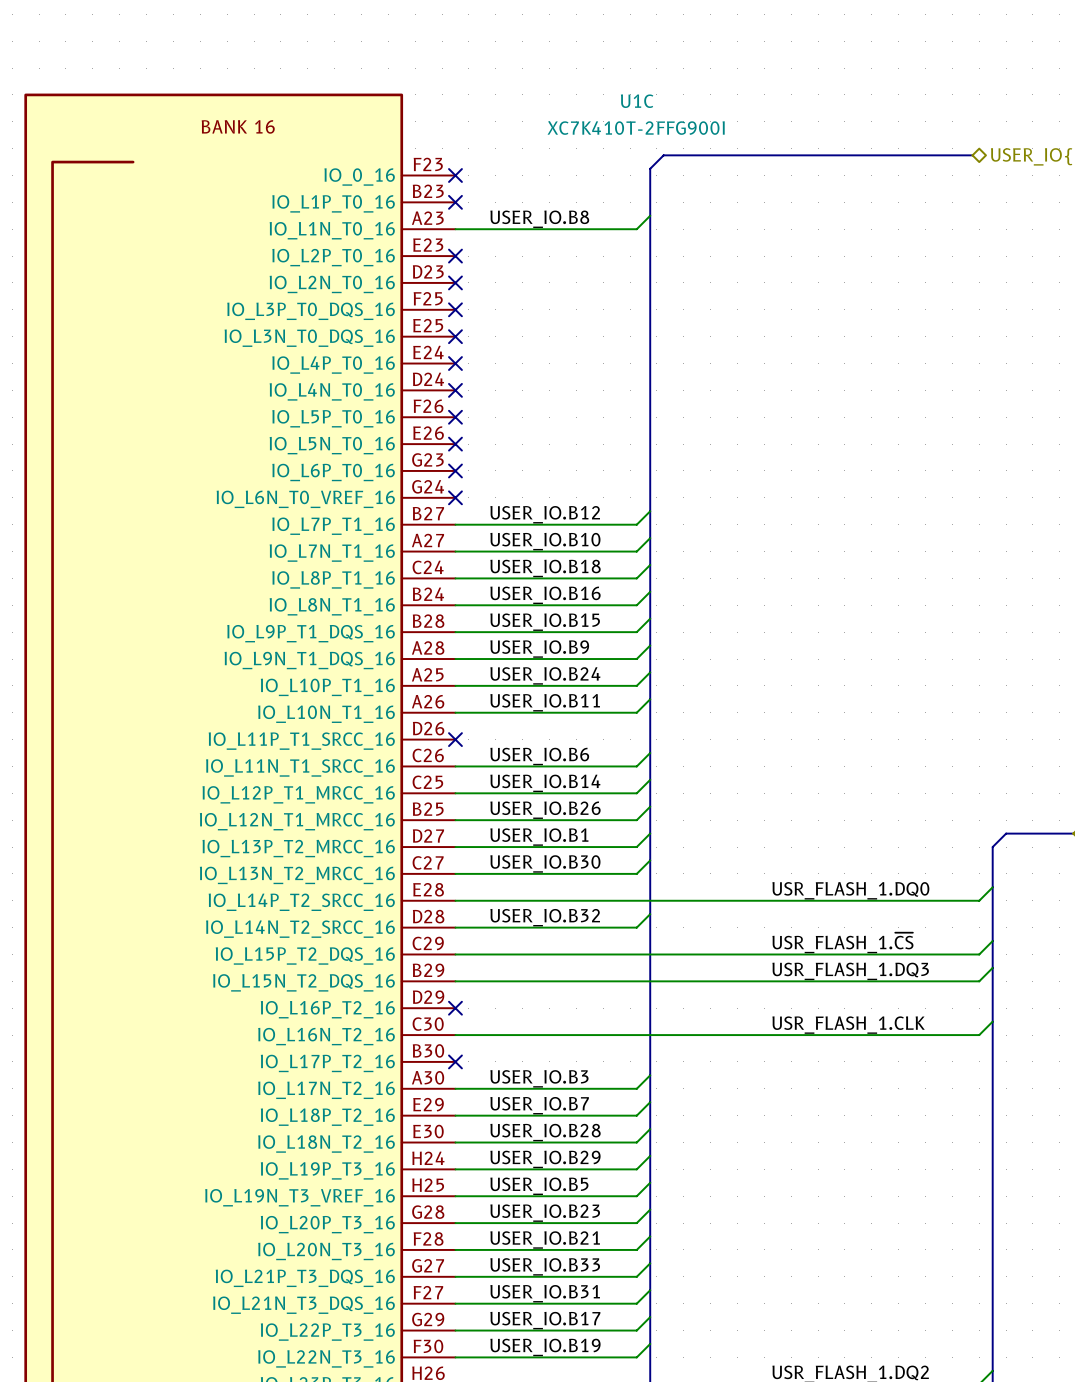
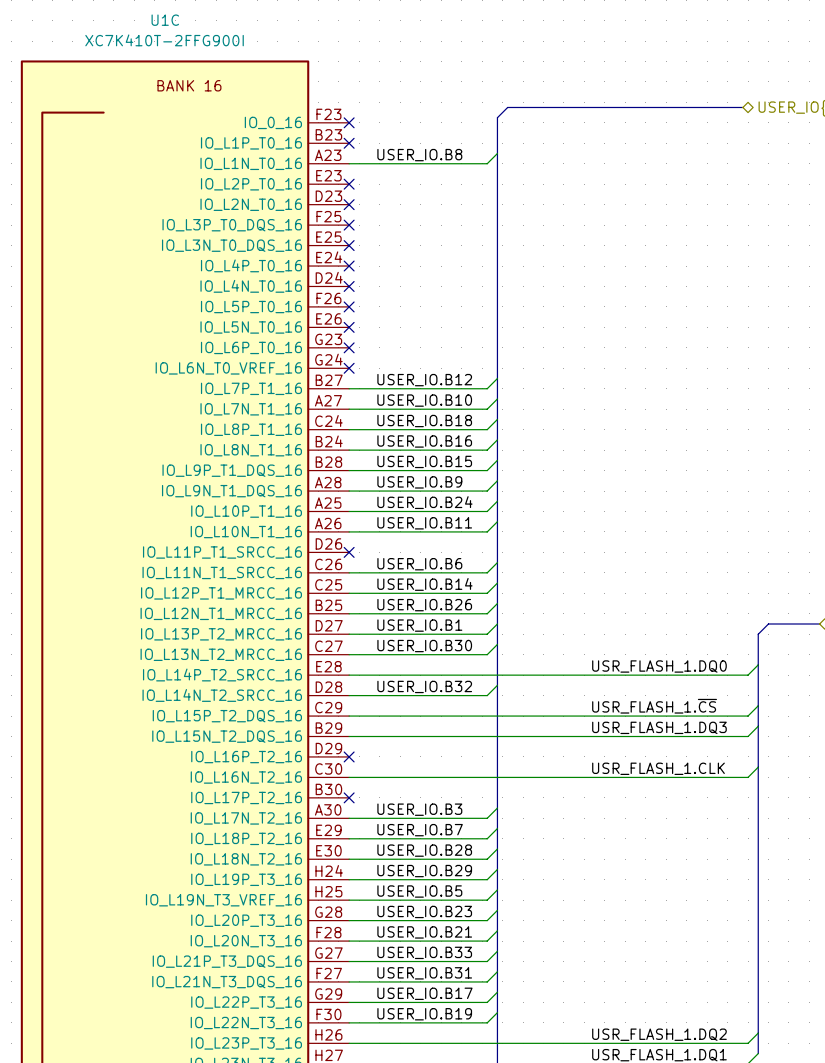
U1C name position: U1C (637, 101) -> U1C (165, 20)
U1C value position: XC7K410T-2FFG900I (636, 128) -> XC7K410T-2FFG900I (164, 40)

